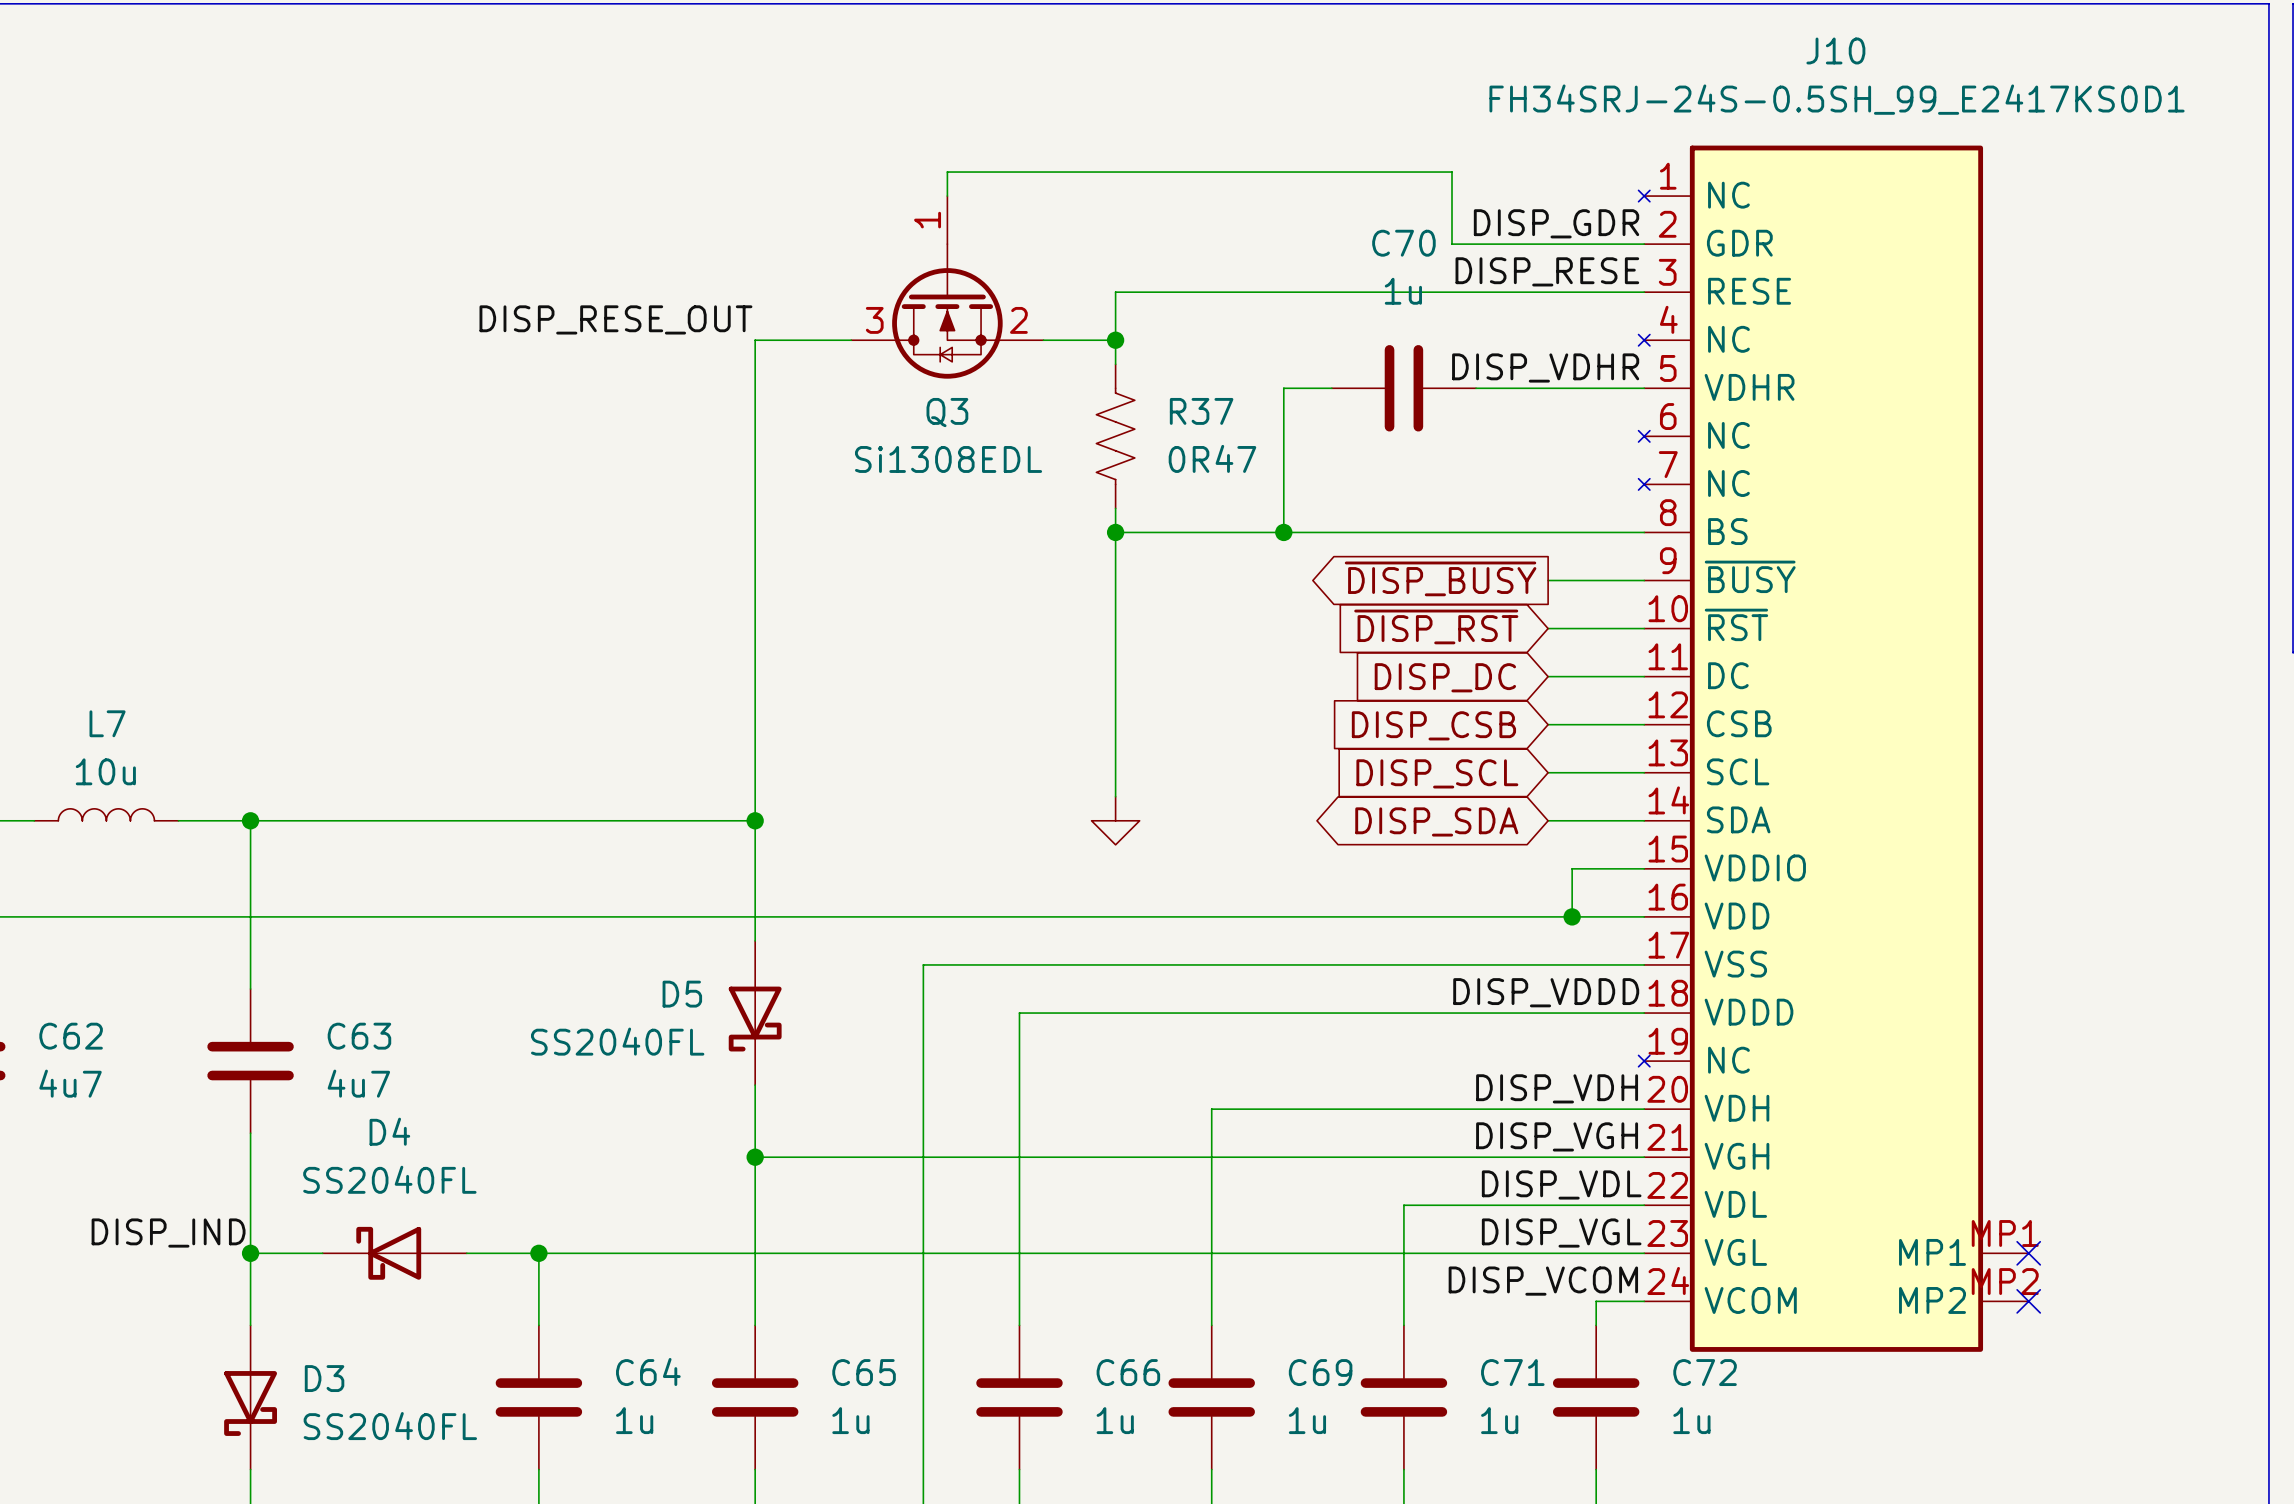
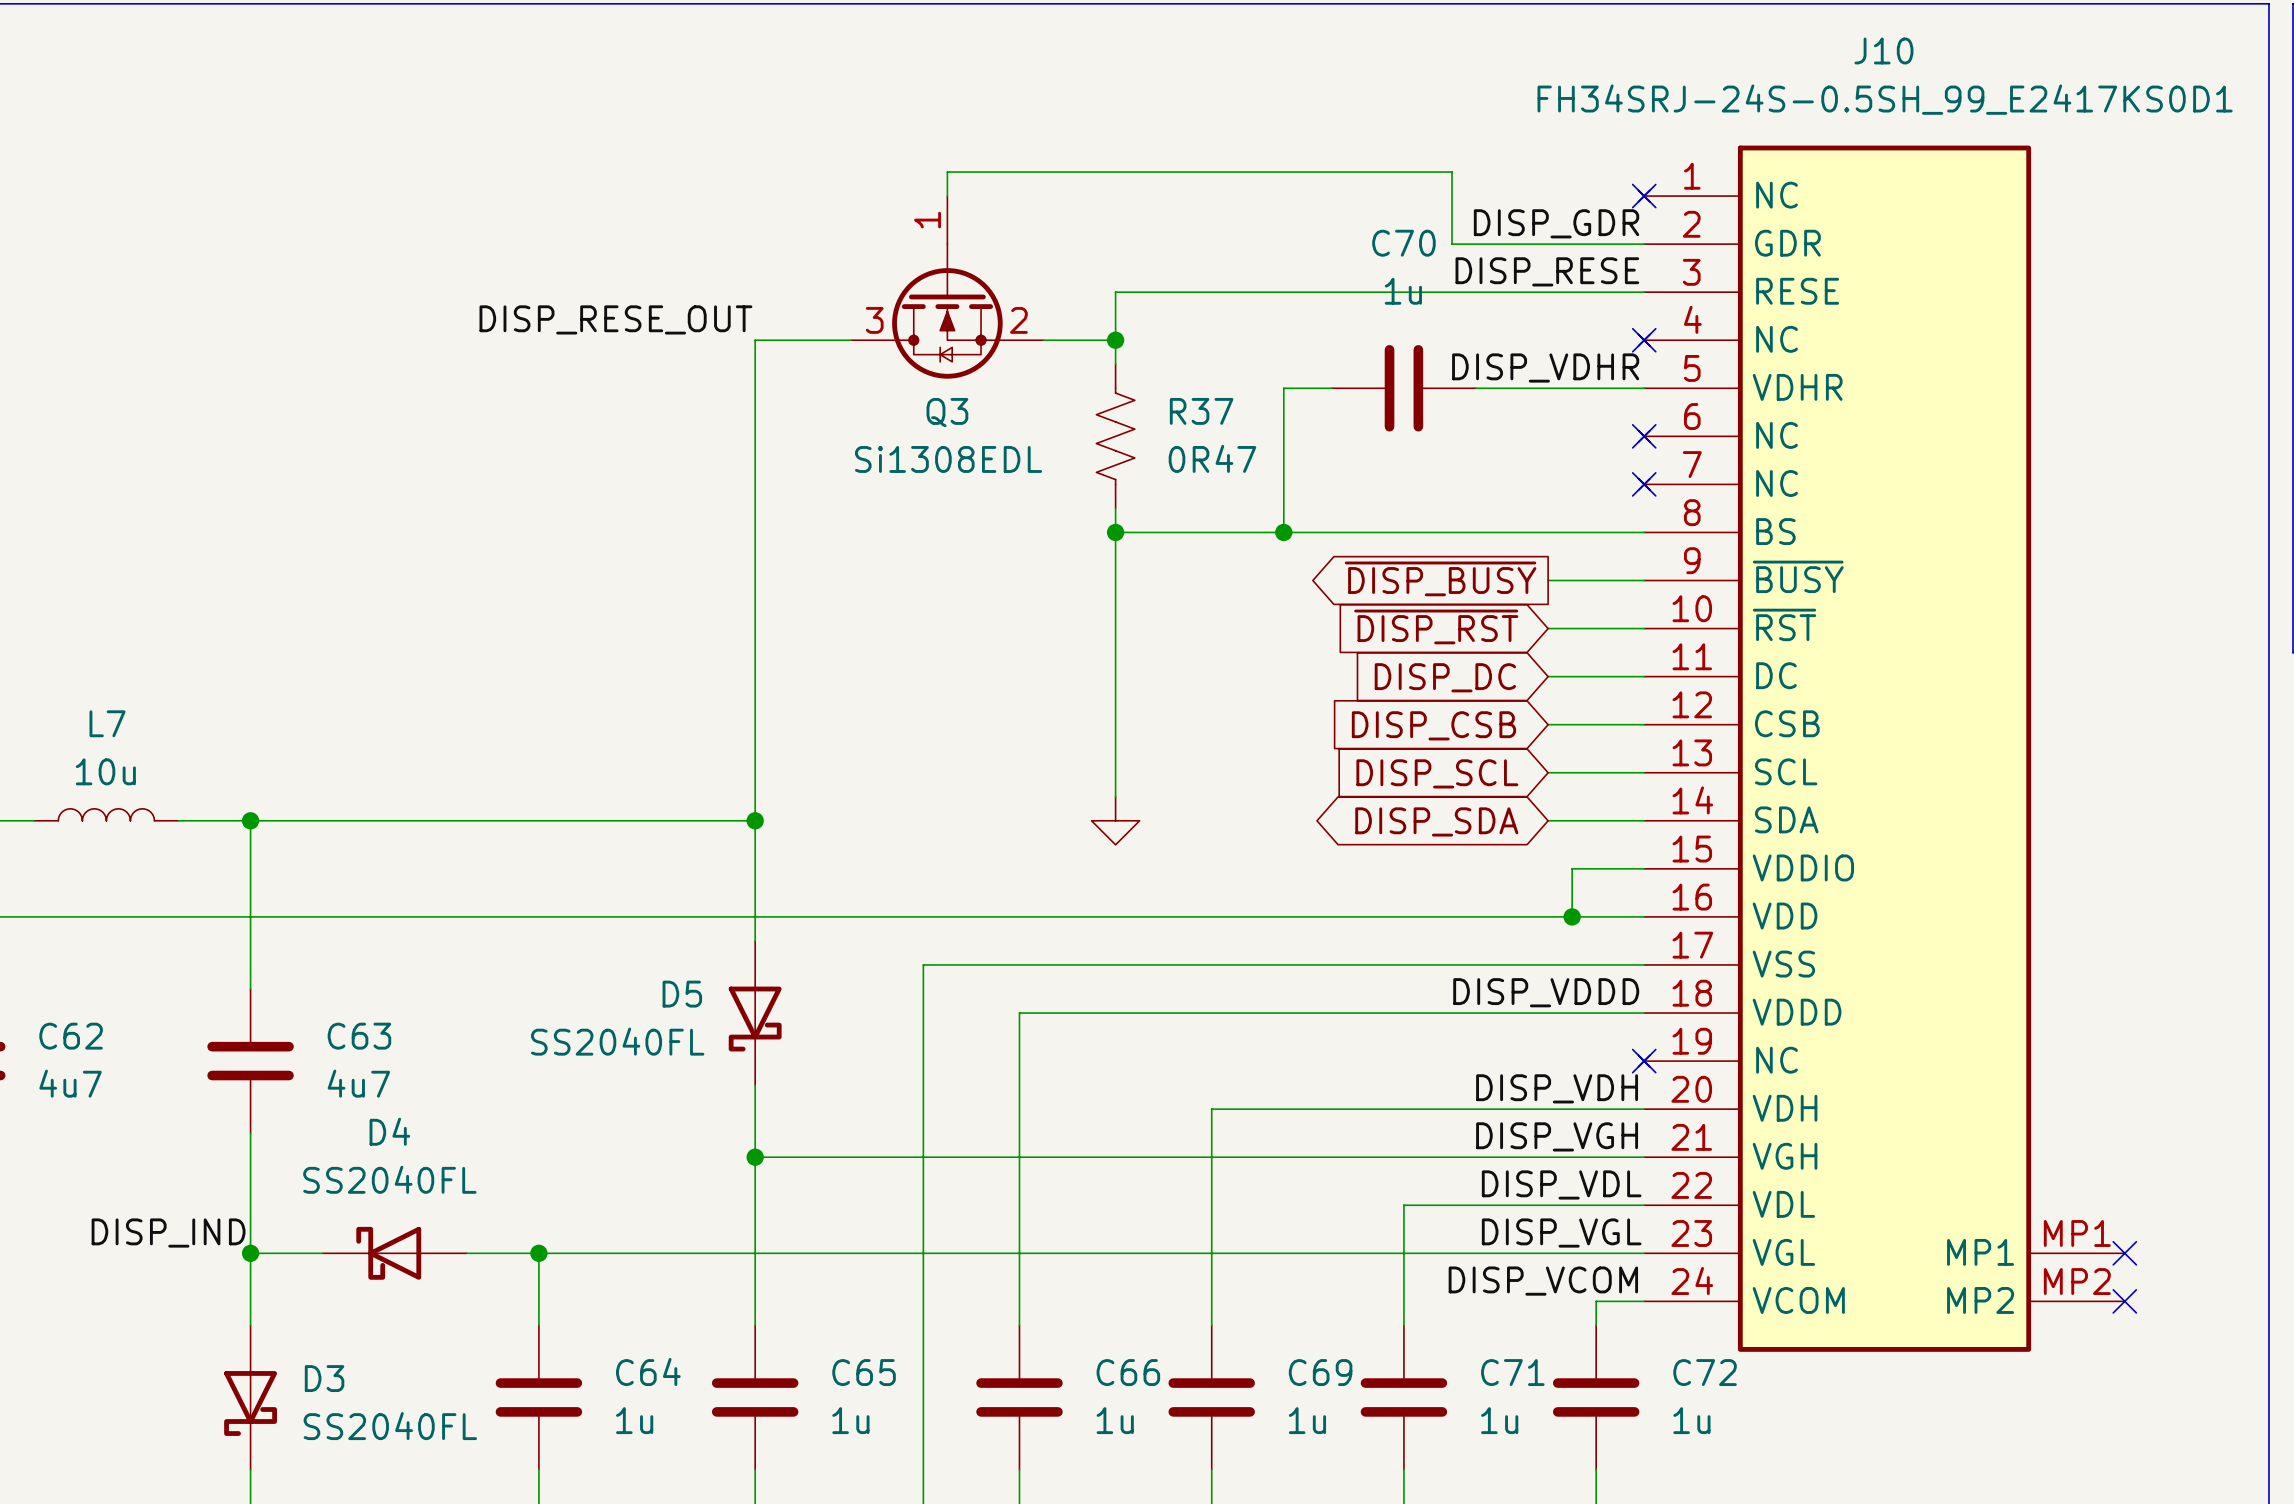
J10 symbol: [1638, 145, 2029, 1352] -> [1638, 145, 2125, 1352]
no-connect mark: none -> (1644, 196)
no-connect mark: none -> (1644, 340)
no-connect mark: none -> (1644, 436)
no-connect mark: none -> (1644, 484)
no-connect mark: none -> (1644, 1061)
no-connect mark: (2028, 1253) -> none
no-connect mark: none -> (2124, 1253)
no-connect mark: (2028, 1301) -> none
no-connect mark: none -> (2124, 1301)

